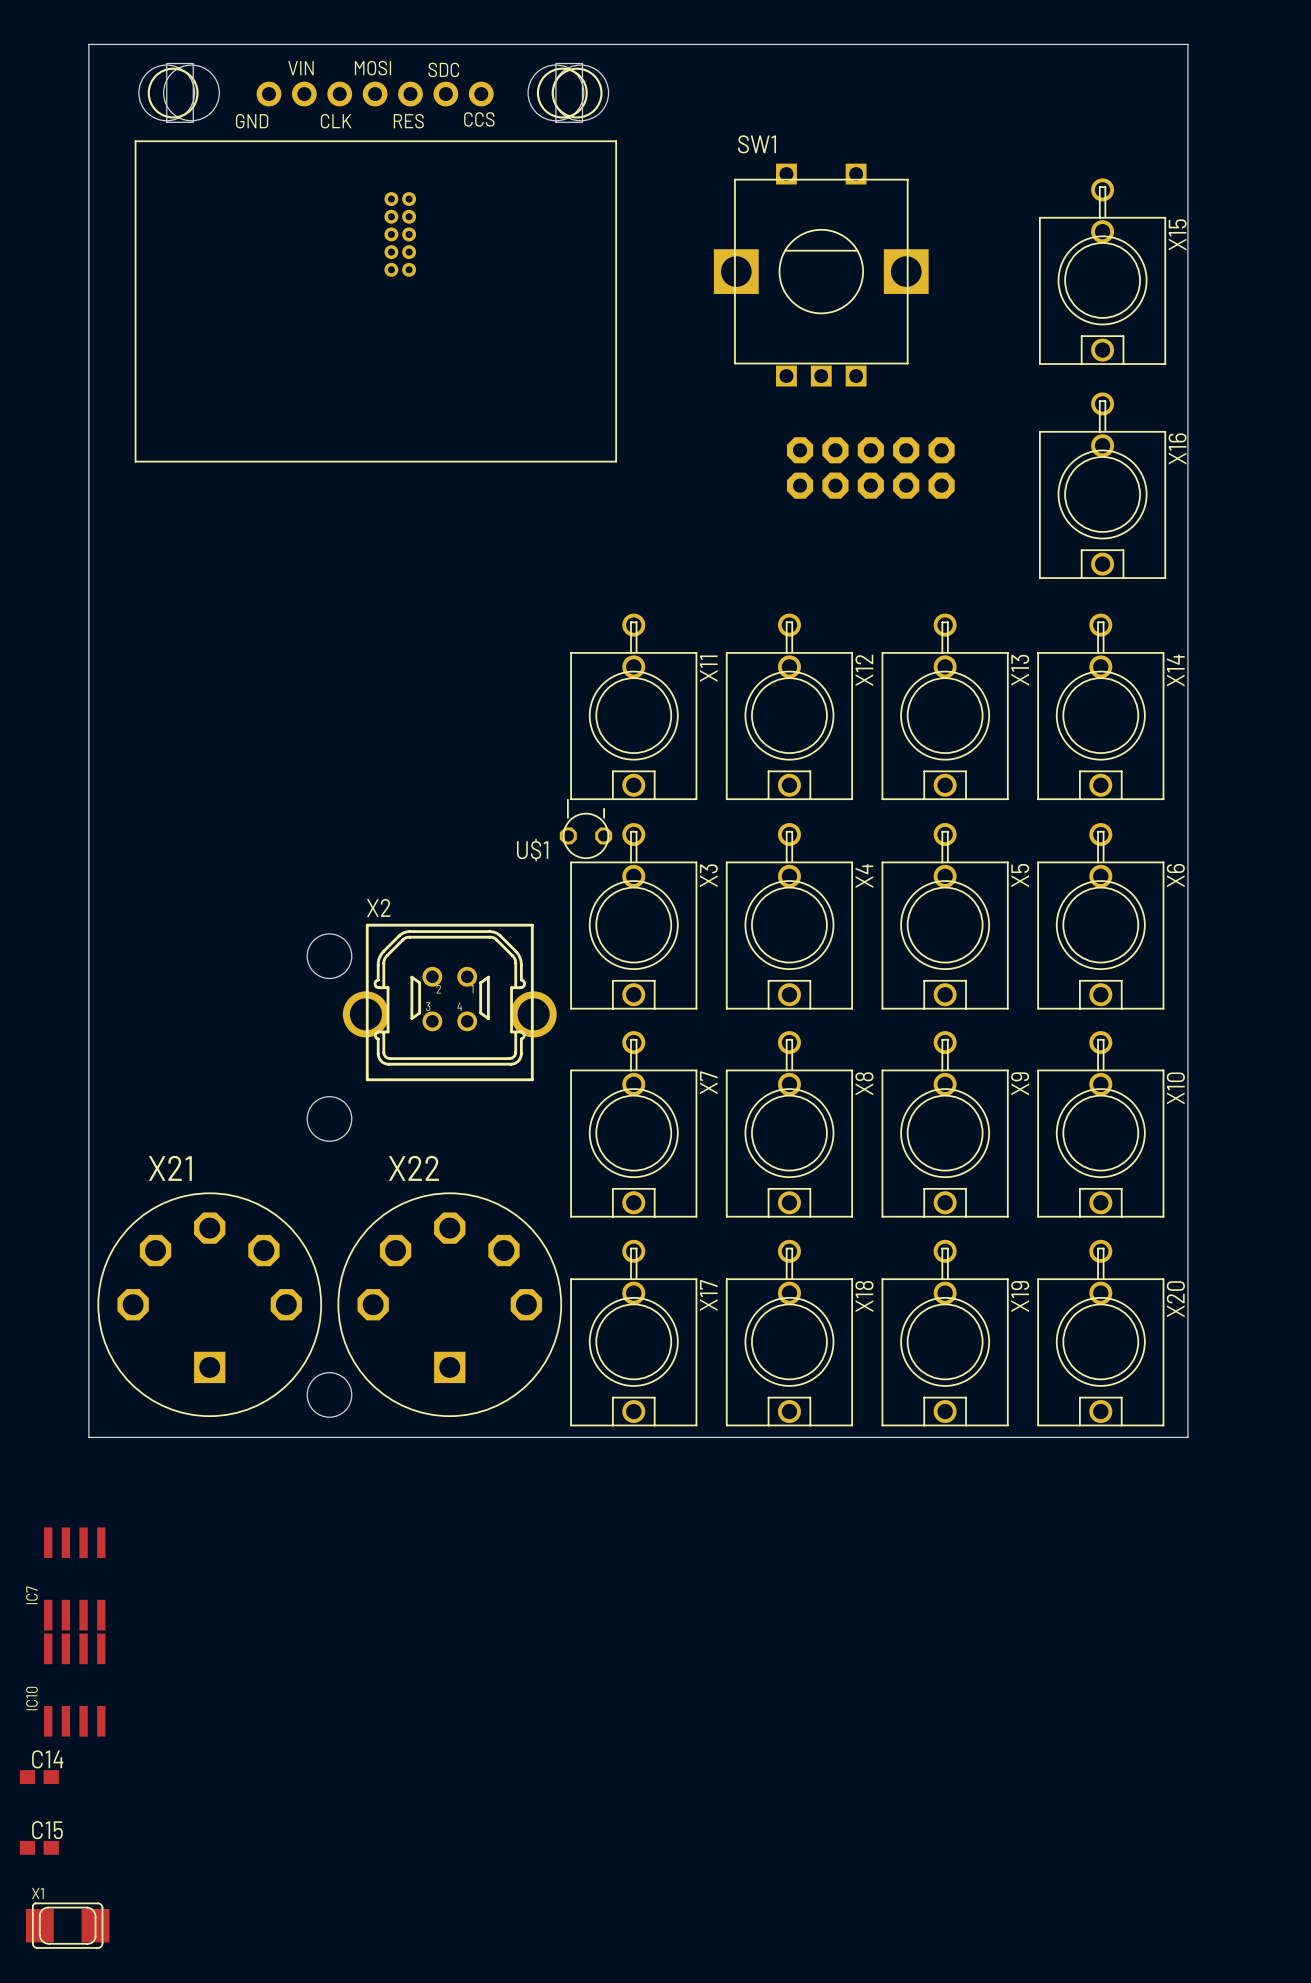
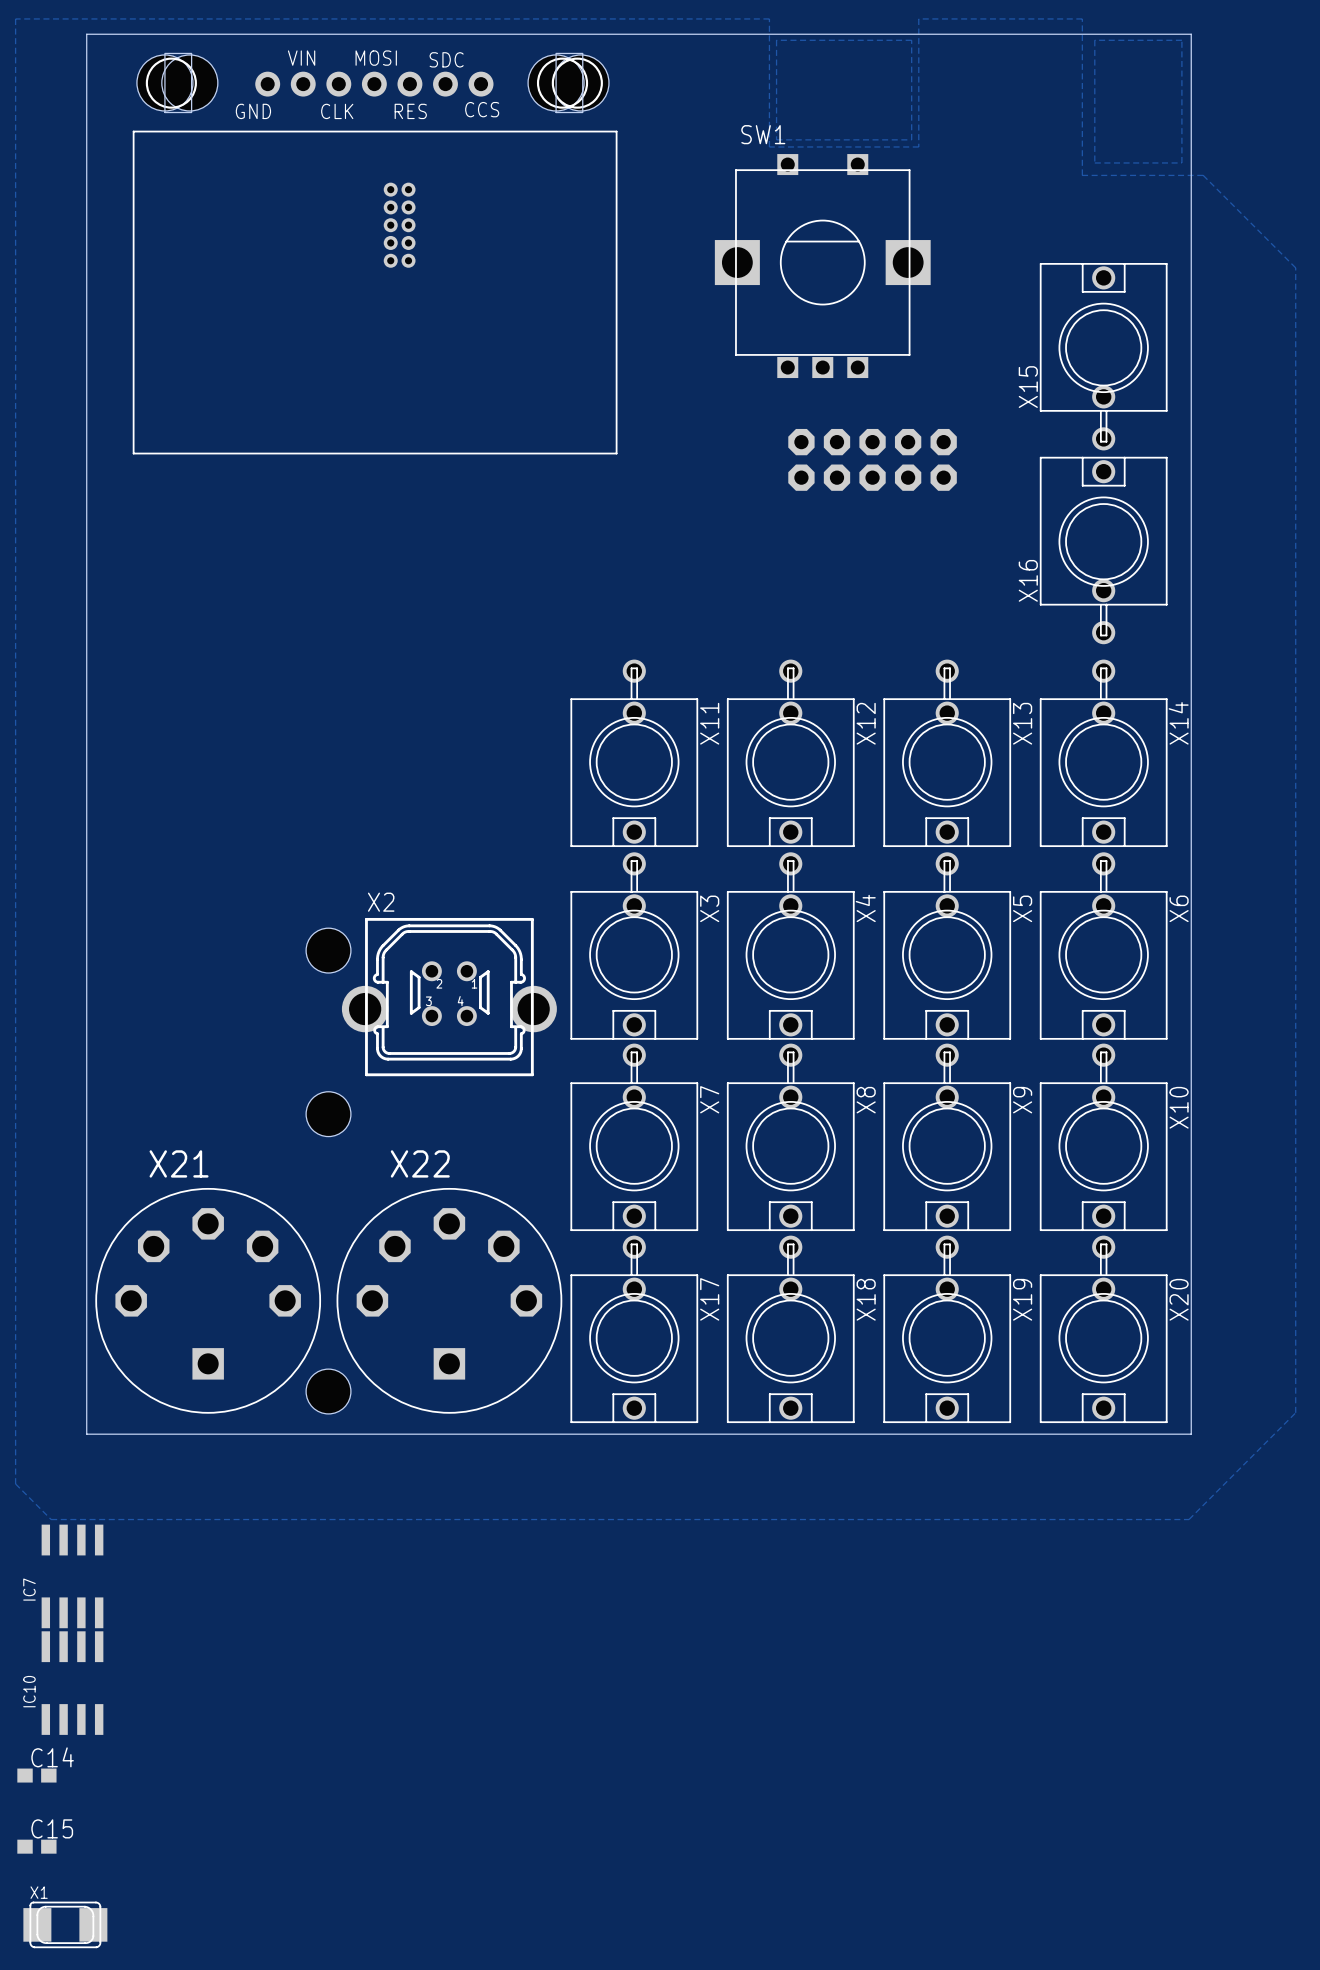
zone outline: none -> (15, 18) (15, 1483) (51, 1519) (1189, 1519) (1295, 1412) (1295, 267) (1203, 175) (1082, 175) (1082, 18) (918, 18) (918, 146) (769, 146) (769, 18) (15, 18)
zone outline: none -> (776, 40) (911, 40) (911, 139) (776, 139) (776, 40)
zone outline: none -> (1094, 40) (1094, 162) (1181, 162) (1181, 40) (1094, 40)
X15 rotation: 0° (1102, 271) -> 180° (1103, 356)
X16 rotation: 0° (1102, 485) -> 180° (1103, 550)
X11 position: (633, 706) -> (634, 753)
X12 position: (789, 706) -> (790, 753)
X13 position: (945, 706) -> (947, 753)
X14 position: (1100, 706) -> (1103, 753)
U$1: (586, 828) -> none
X3 position: (633, 916) -> (634, 946)
X4 position: (789, 916) -> (790, 946)
X5 position: (945, 916) -> (947, 946)
X6 position: (1100, 916) -> (1103, 946)
X7 position: (633, 1124) -> (634, 1137)
X8 position: (789, 1124) -> (790, 1137)
X9 position: (945, 1124) -> (947, 1137)
X10 position: (1100, 1124) -> (1103, 1137)

